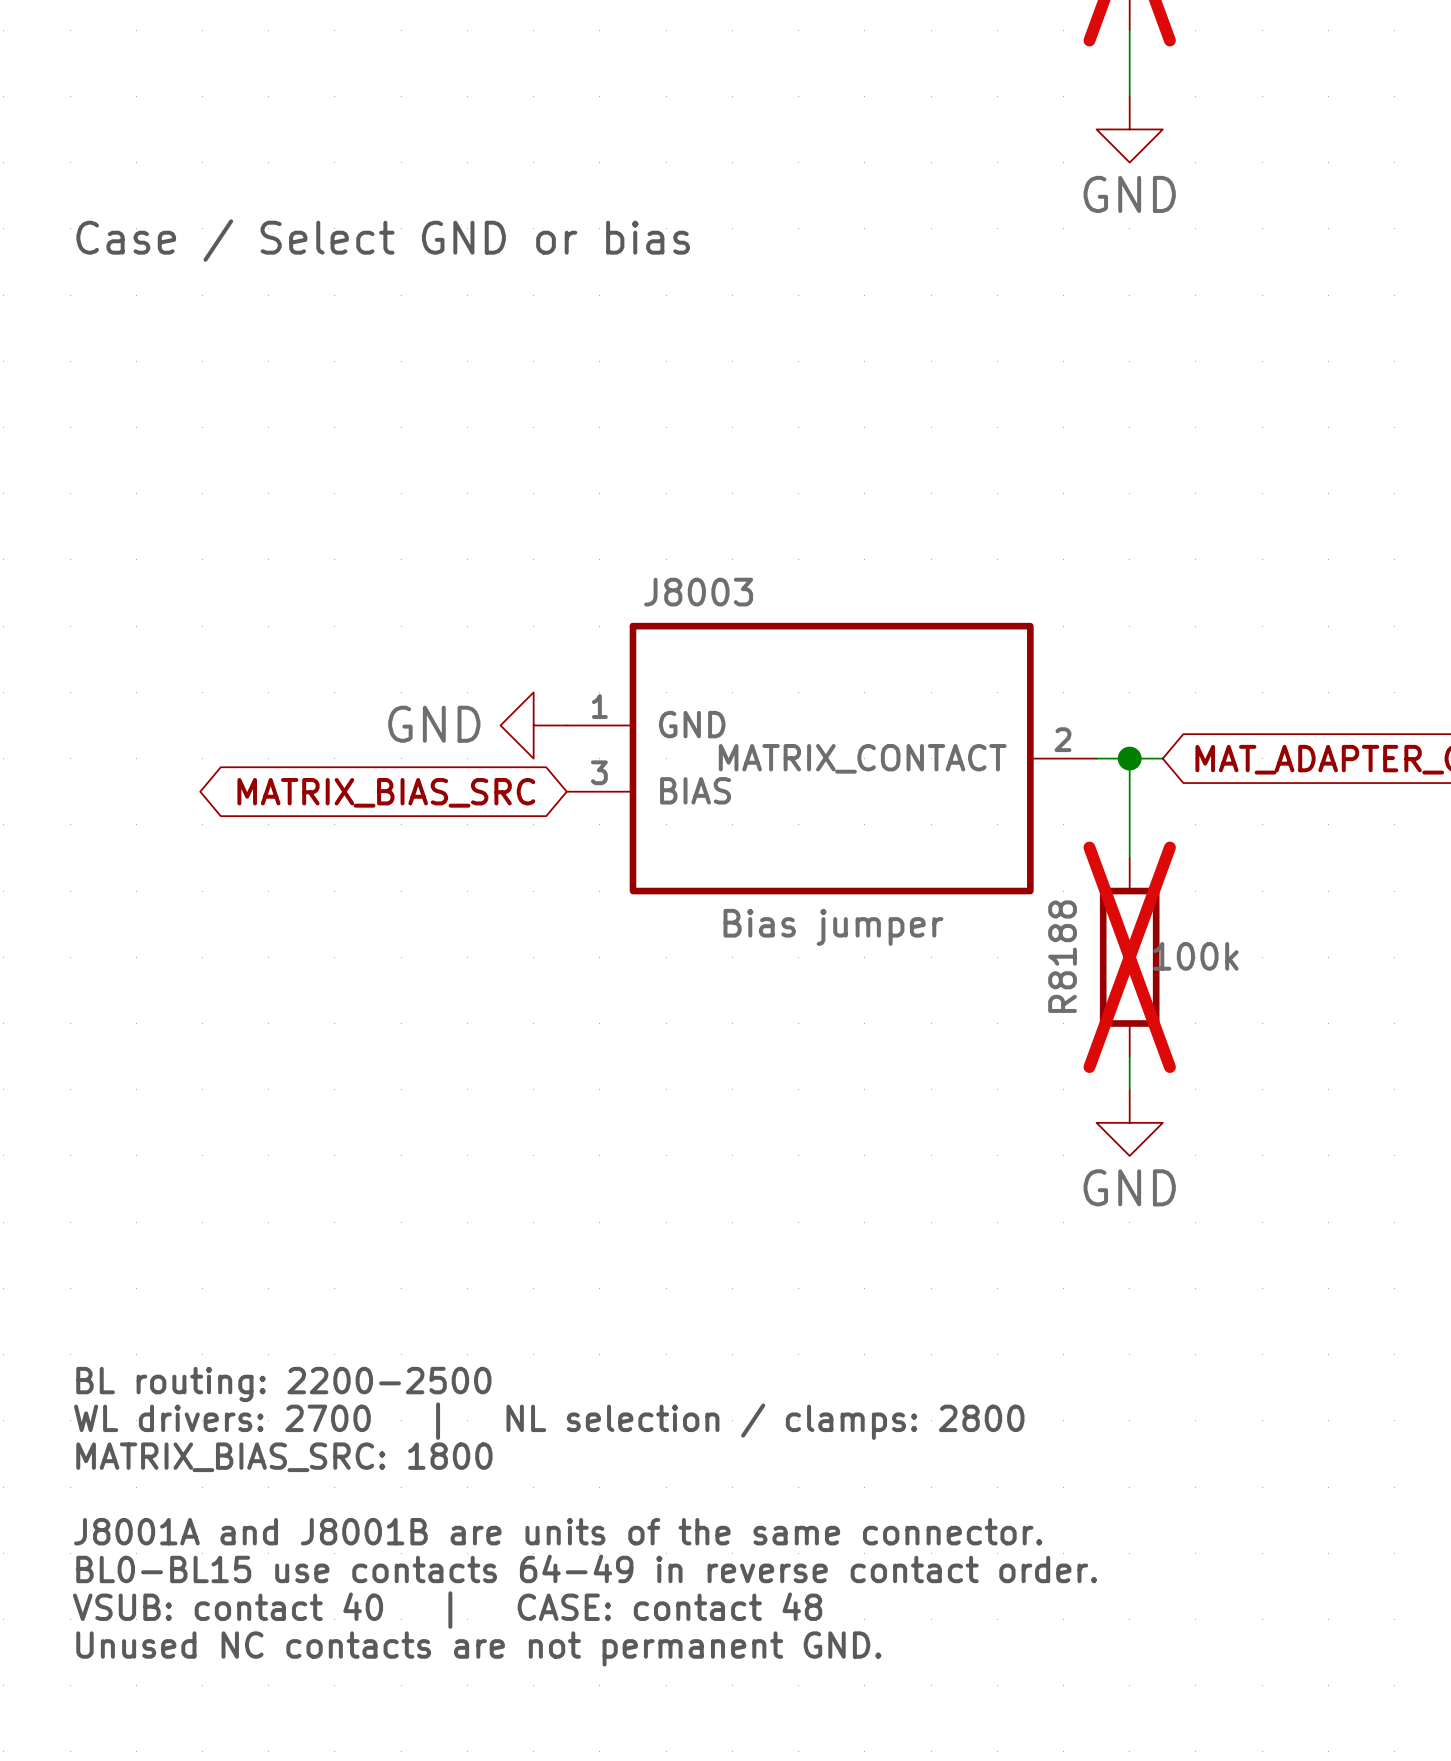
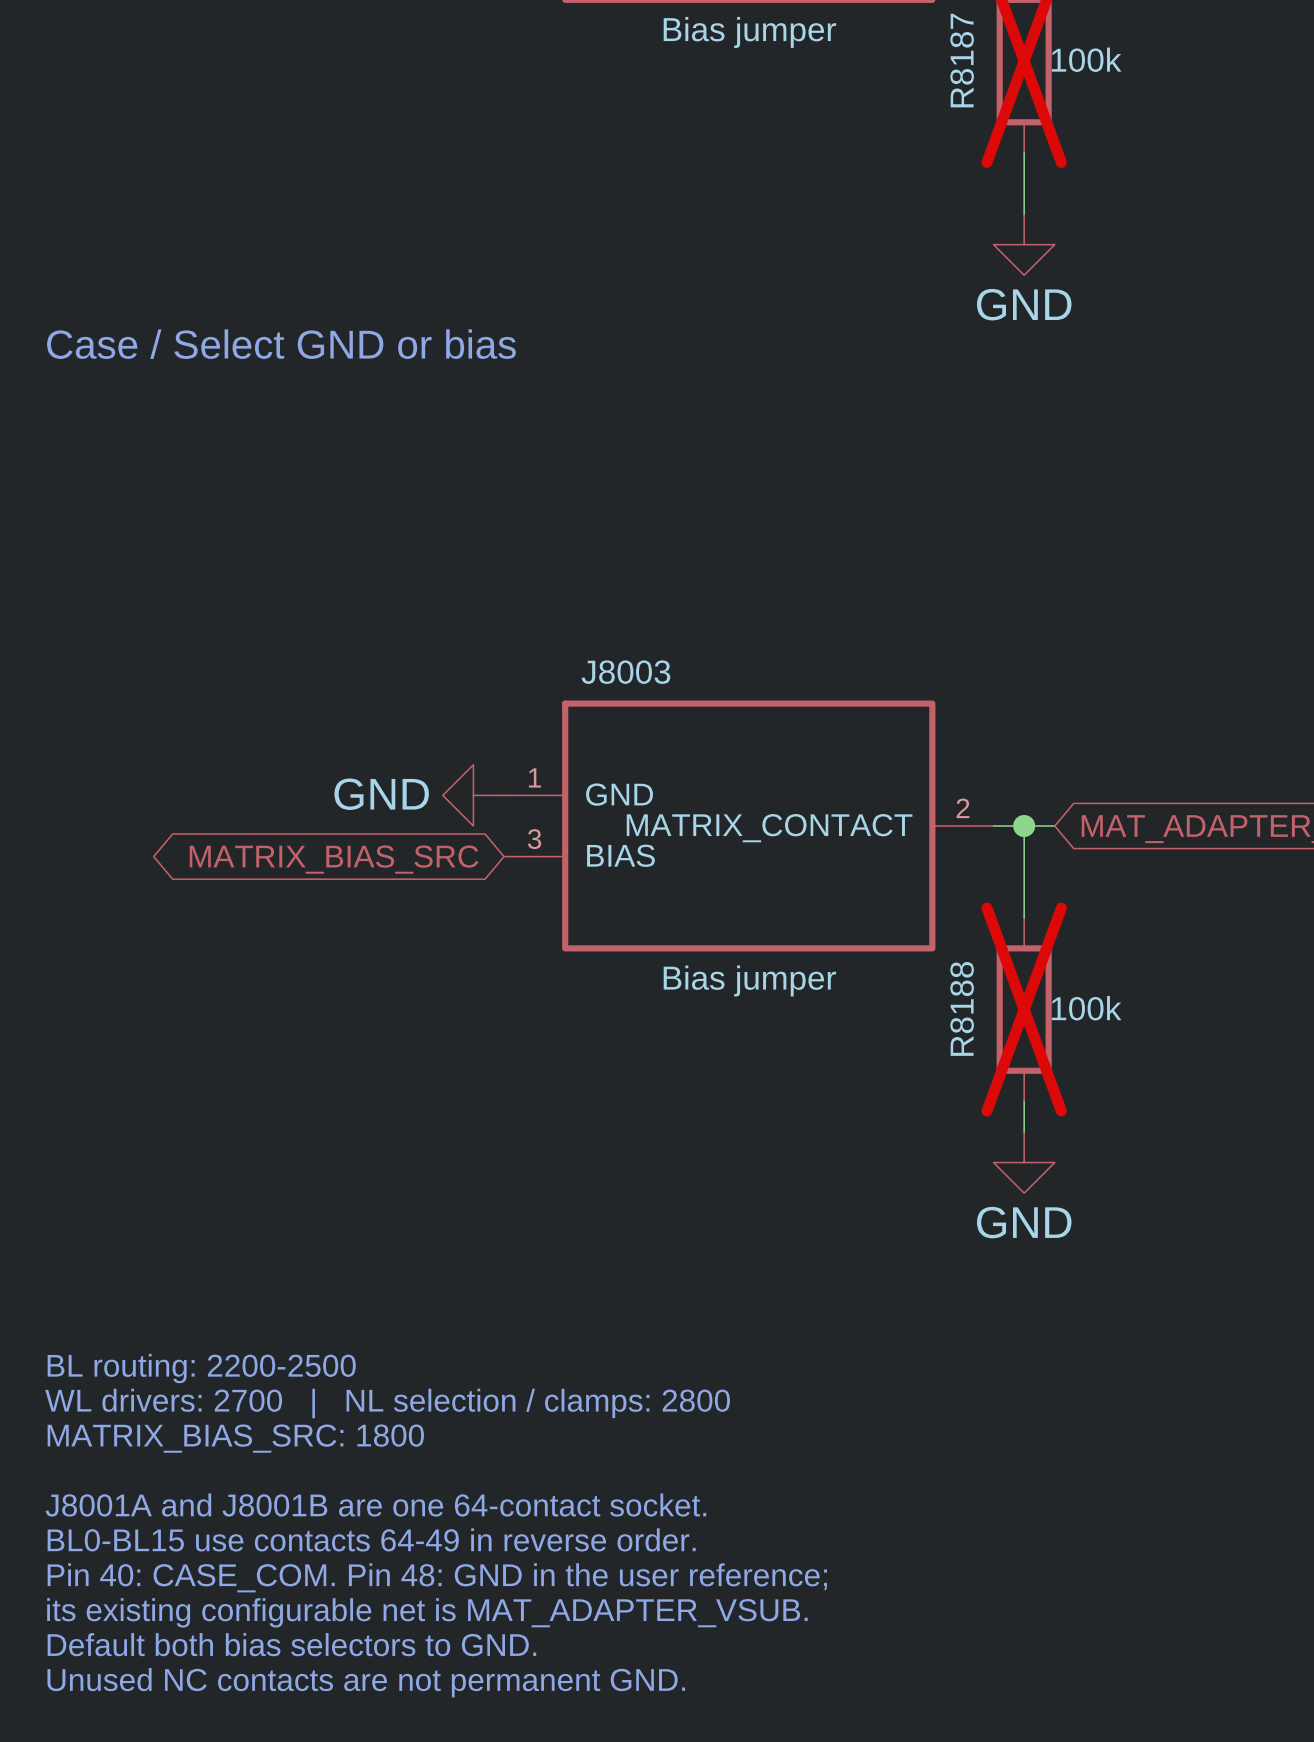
text: none -> BL routing: 2200-2500 (201, 1368)
text: BL routing: 2200-2500 (283, 1384) -> WL drivers: 2700 | NL selection / clamps: 2800 (387, 1403)
text: WL drivers: 2700 | NL selection / clamps: 2800 (549, 1421) -> MATRIX_BIAS_SRC: 1800 (235, 1438)
text: MATRIX_BIAS_SRC: 1800 (284, 1457) -> none
text: none -> J8001A and J8001B are one 64-contact socket. (375, 1505)
text: J8001A and J8001B are units of the same connector. (558, 1531) -> BL0-BL15 use contacts 64-49 in reverse order. (371, 1539)
text: BL0-BL15 use contacts 64-49 in reverse contact order. (586, 1568) -> Pin 40: CASE_COM. Pin 48: GND in the user reference; (437, 1577)
text: VSUB: contact 40 | CASE: contact 48 (447, 1610) -> its existing configurable net is MAT_ADAPTER_VSUB. (427, 1612)
text: Unused NC contacts are not permanent GND. (478, 1648) -> Default both bias selectors to GND. (291, 1644)
text: none -> Unused NC contacts are not permanent GND. (366, 1682)

